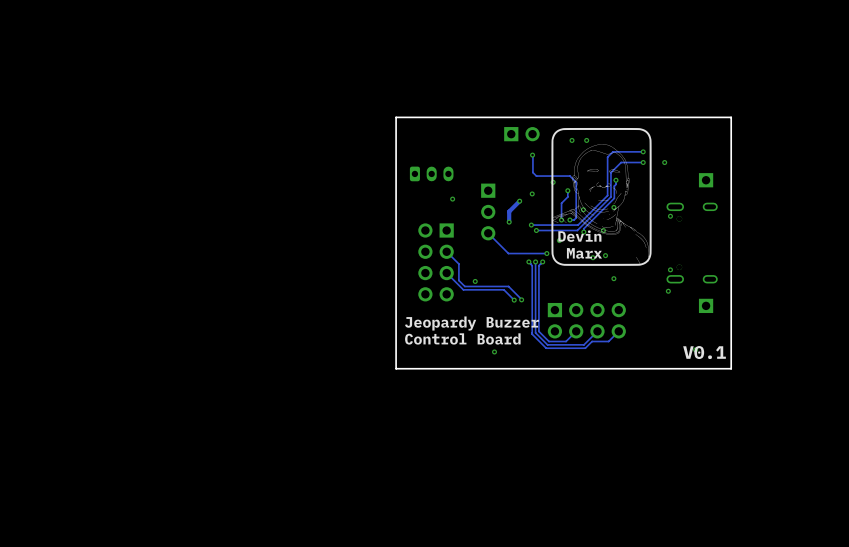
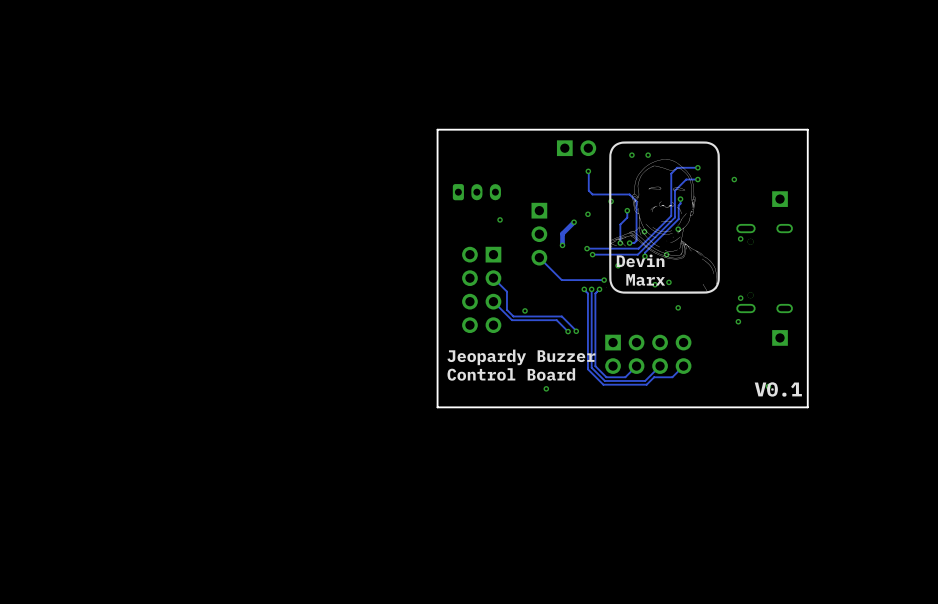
via: none -> (697, 167)
track: (643, 151) (631, 151) -> none
via: (643, 151) -> none
via: none -> (697, 179)
track: (643, 162) (631, 162) -> none
via: (643, 162) -> none

